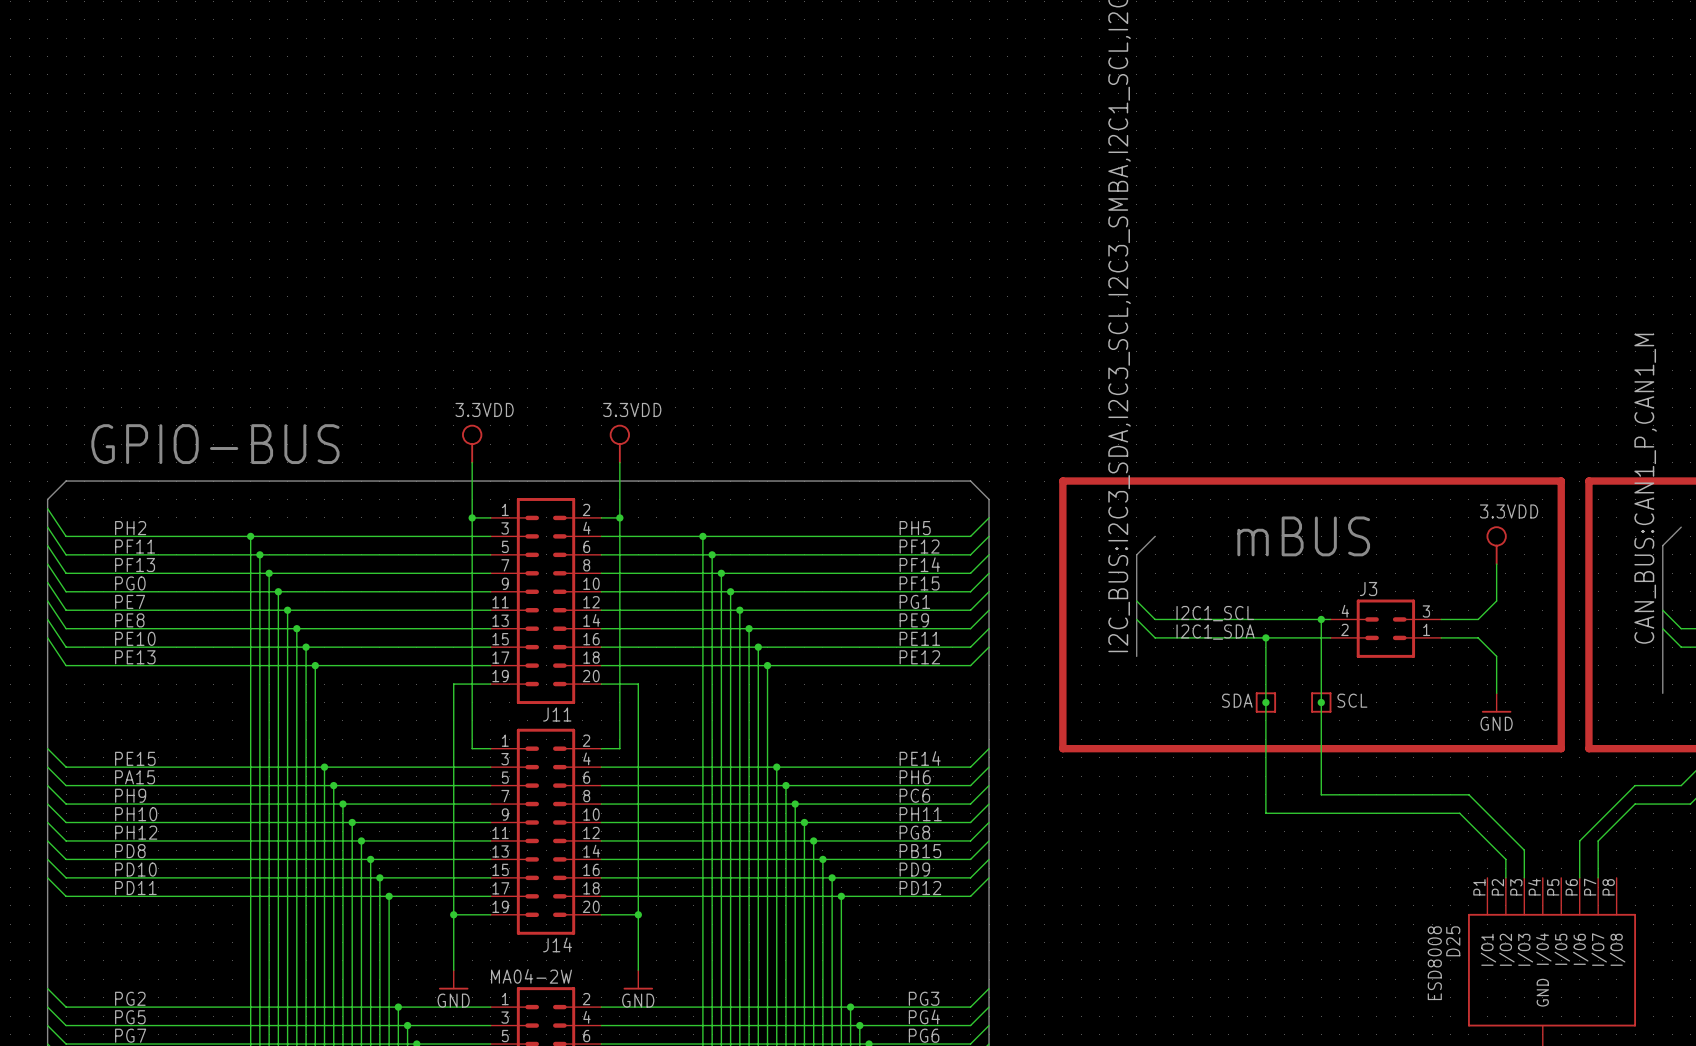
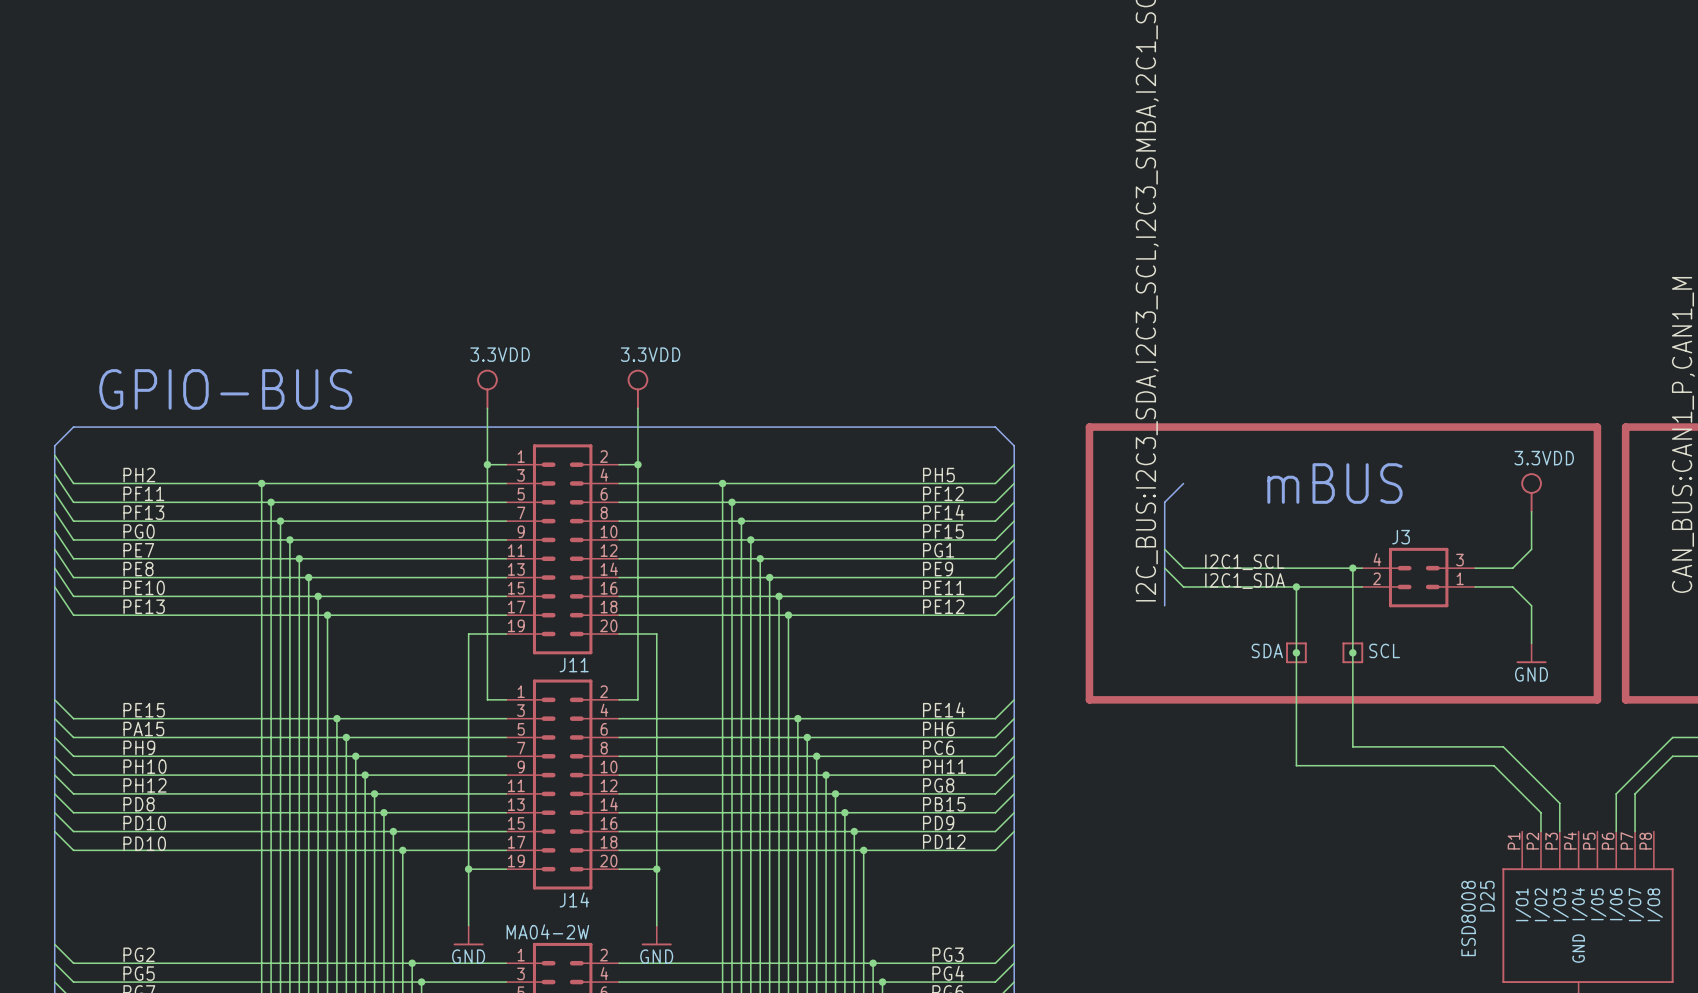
label: PD11 (135, 888) -> PD10 (144, 843)

